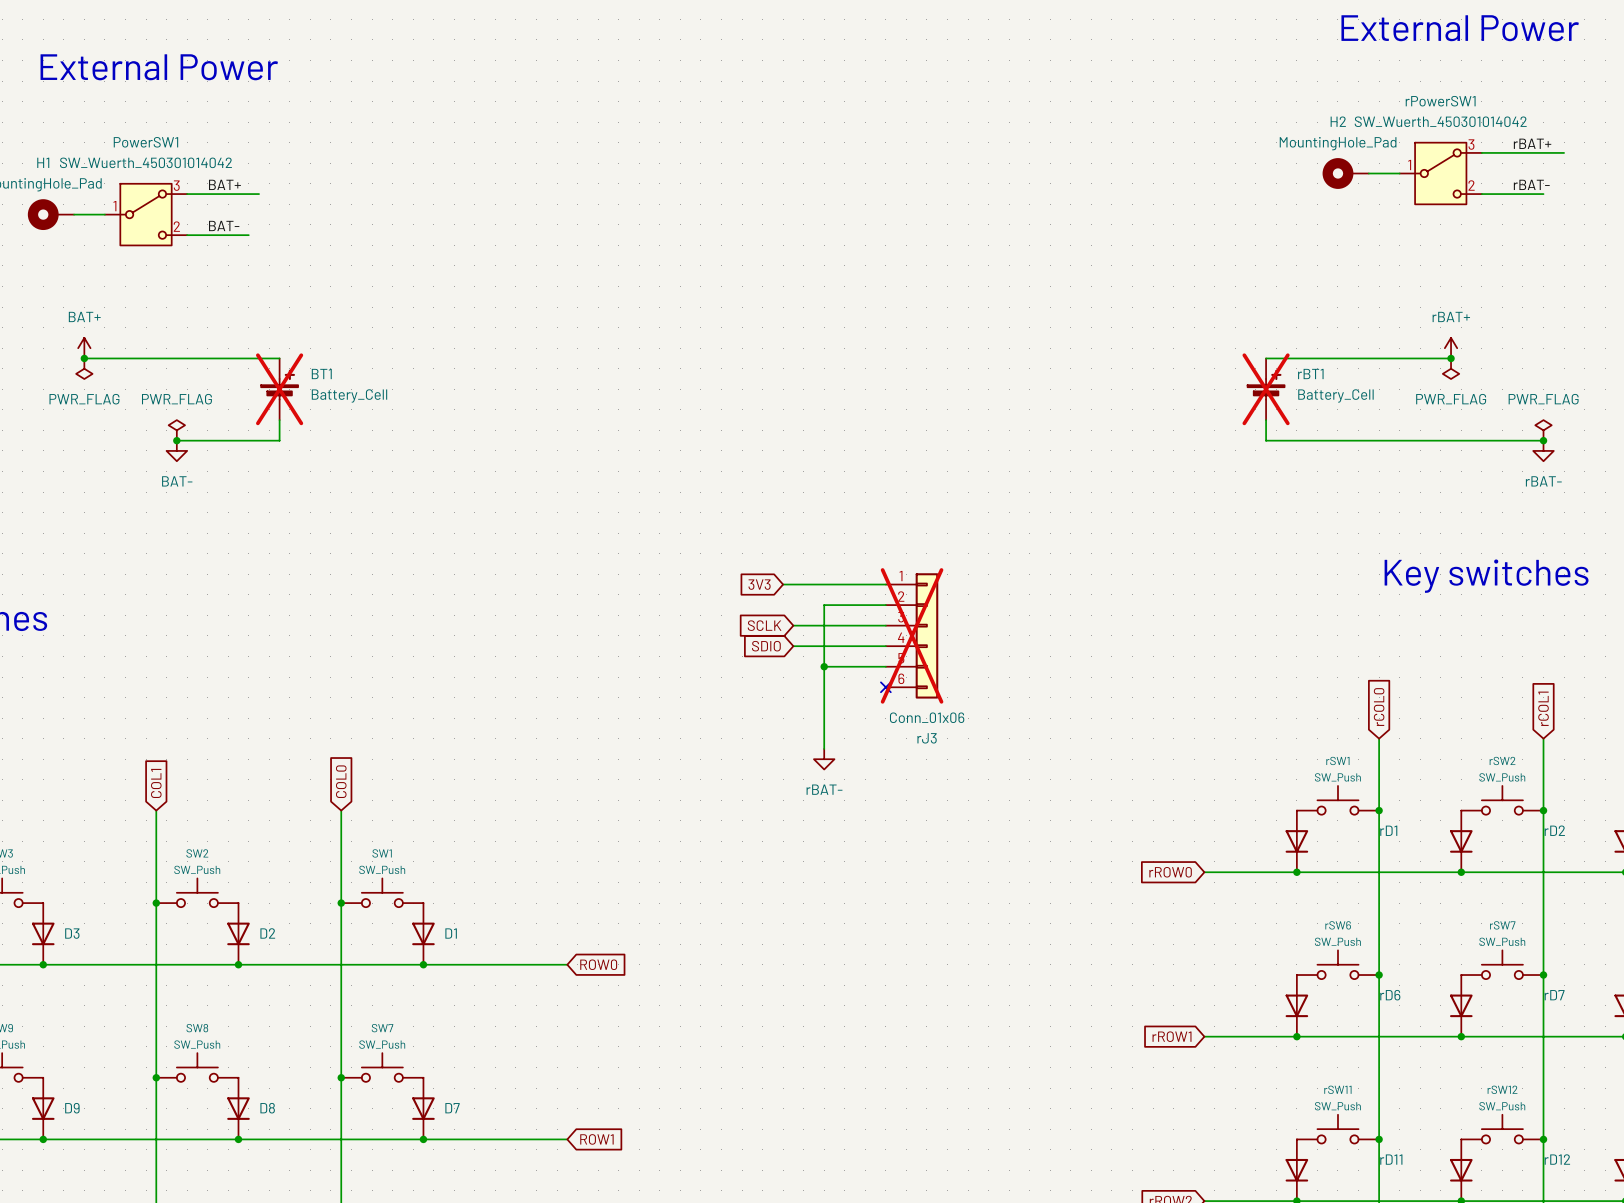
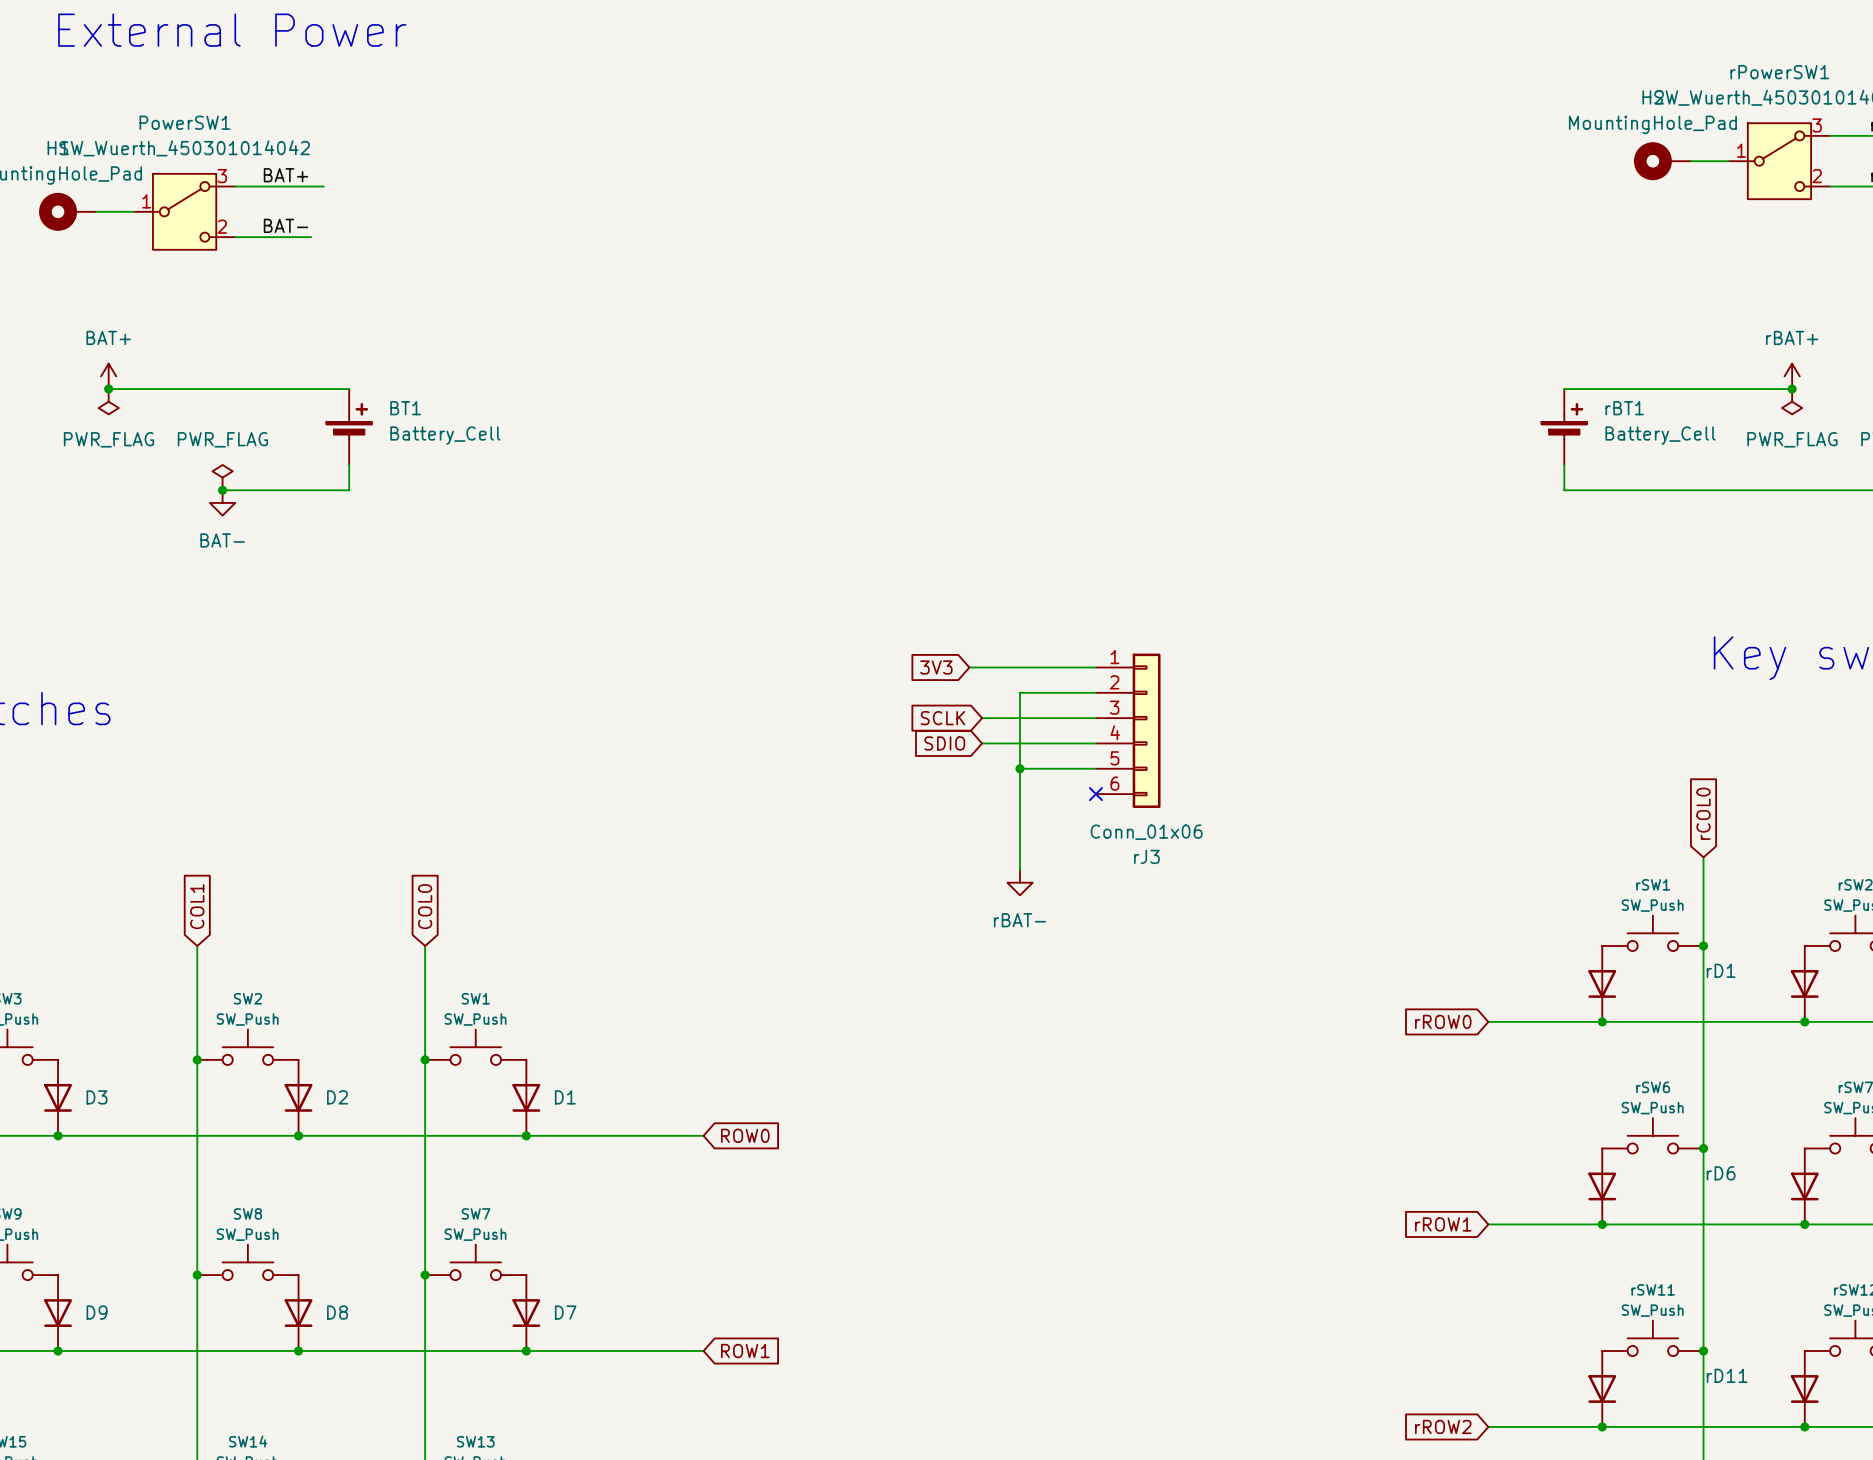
BT1 do-not-place cross: (279, 389) -> none
rBT1 do-not-place cross: (1266, 389) -> none
rJ3 do-not-place cross: (912, 635) -> none

